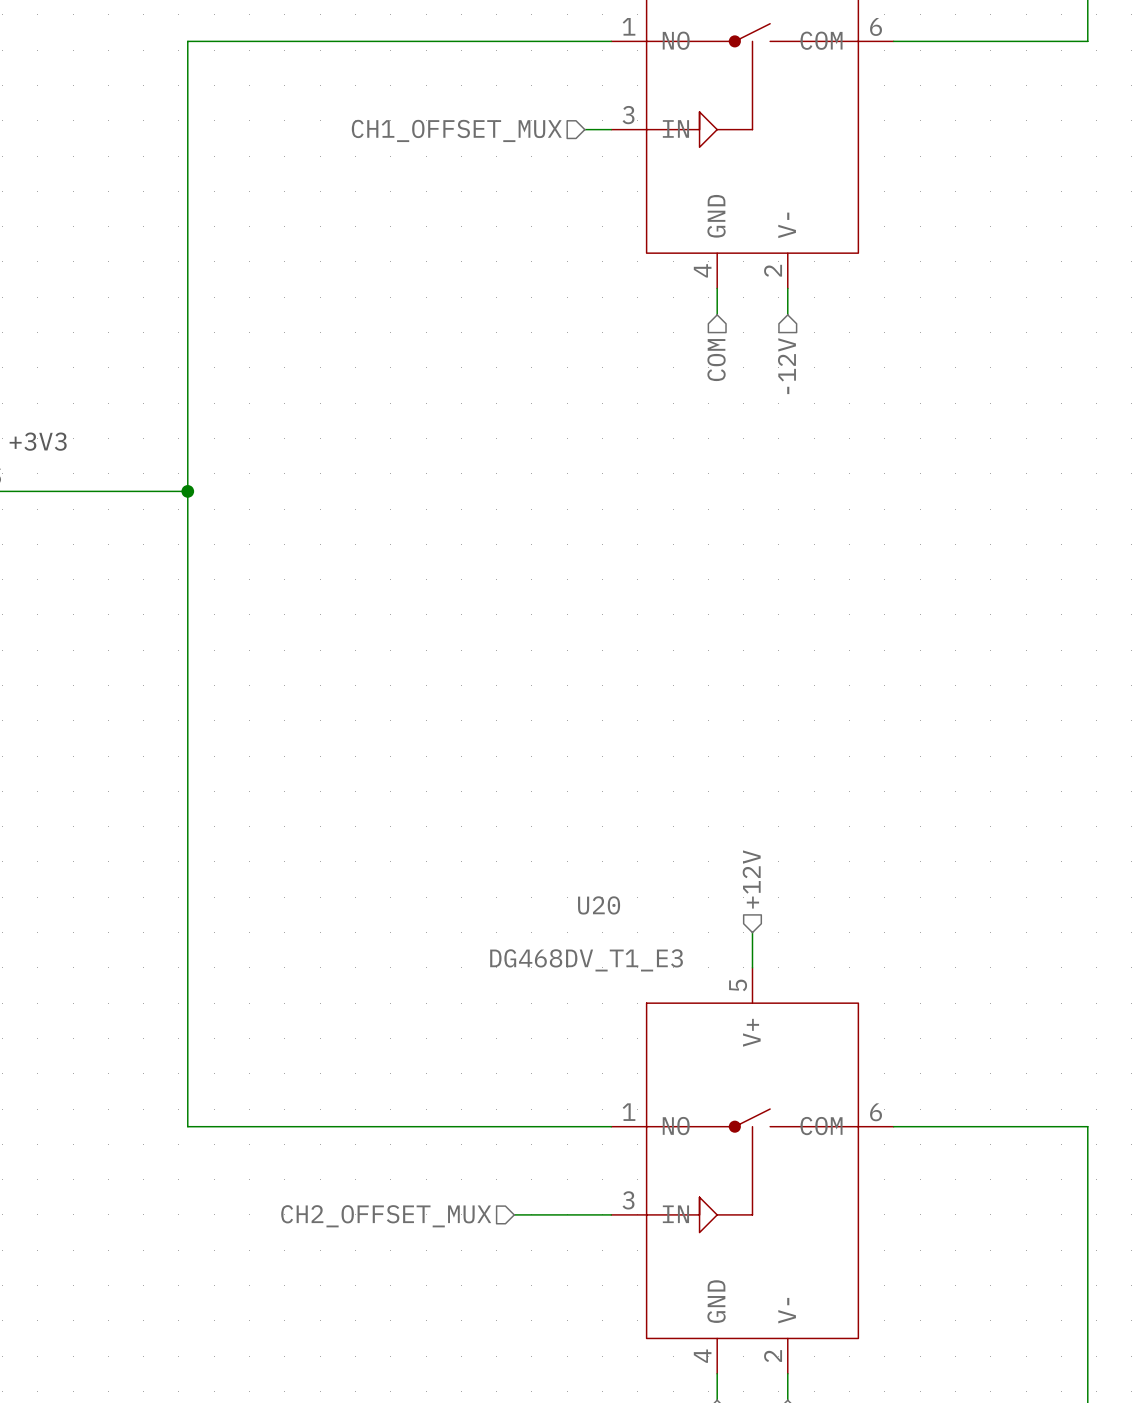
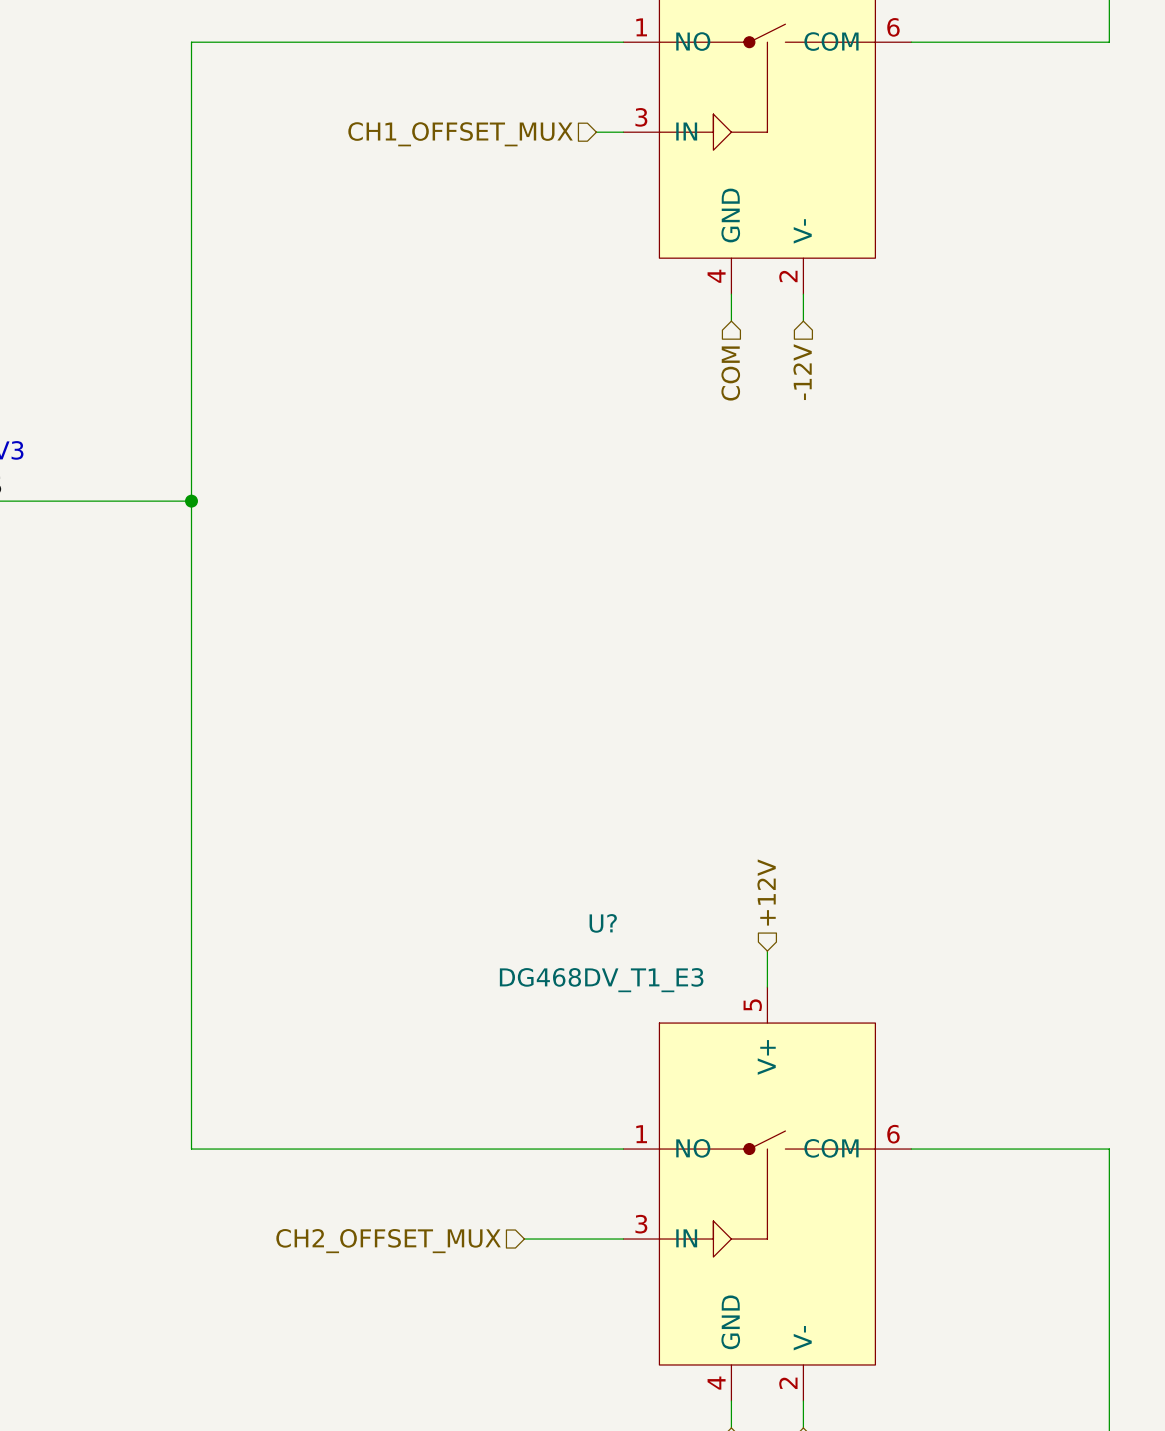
U20 name: U20 (599, 905) -> U? (603, 923)

